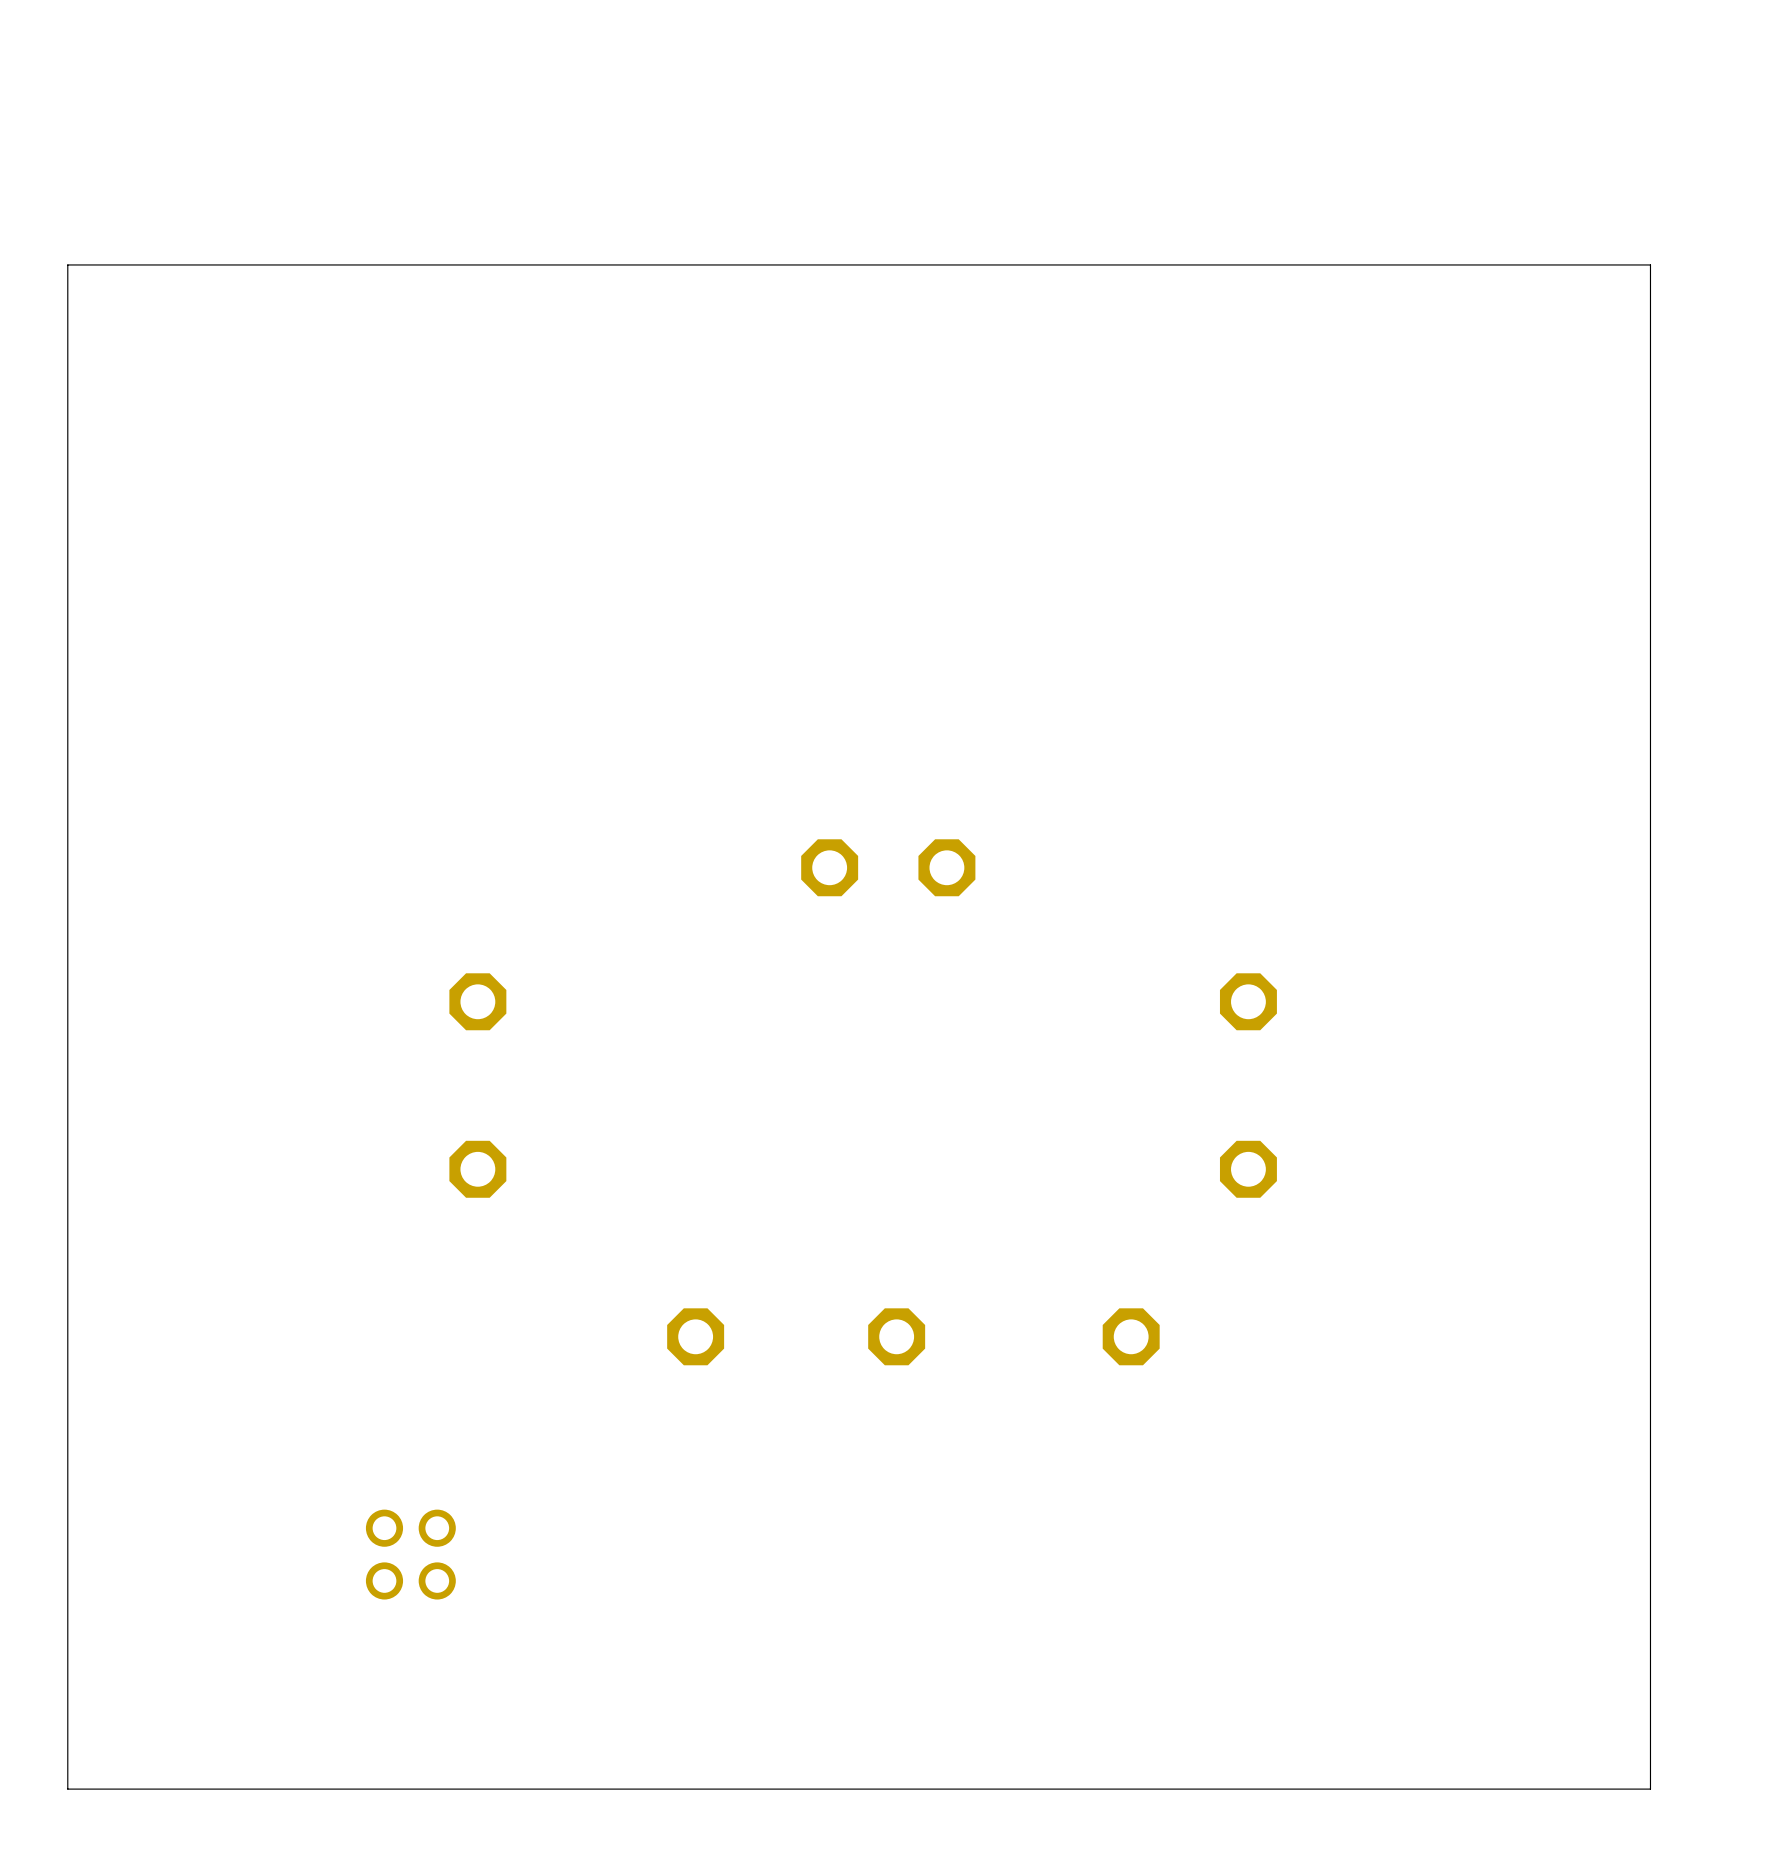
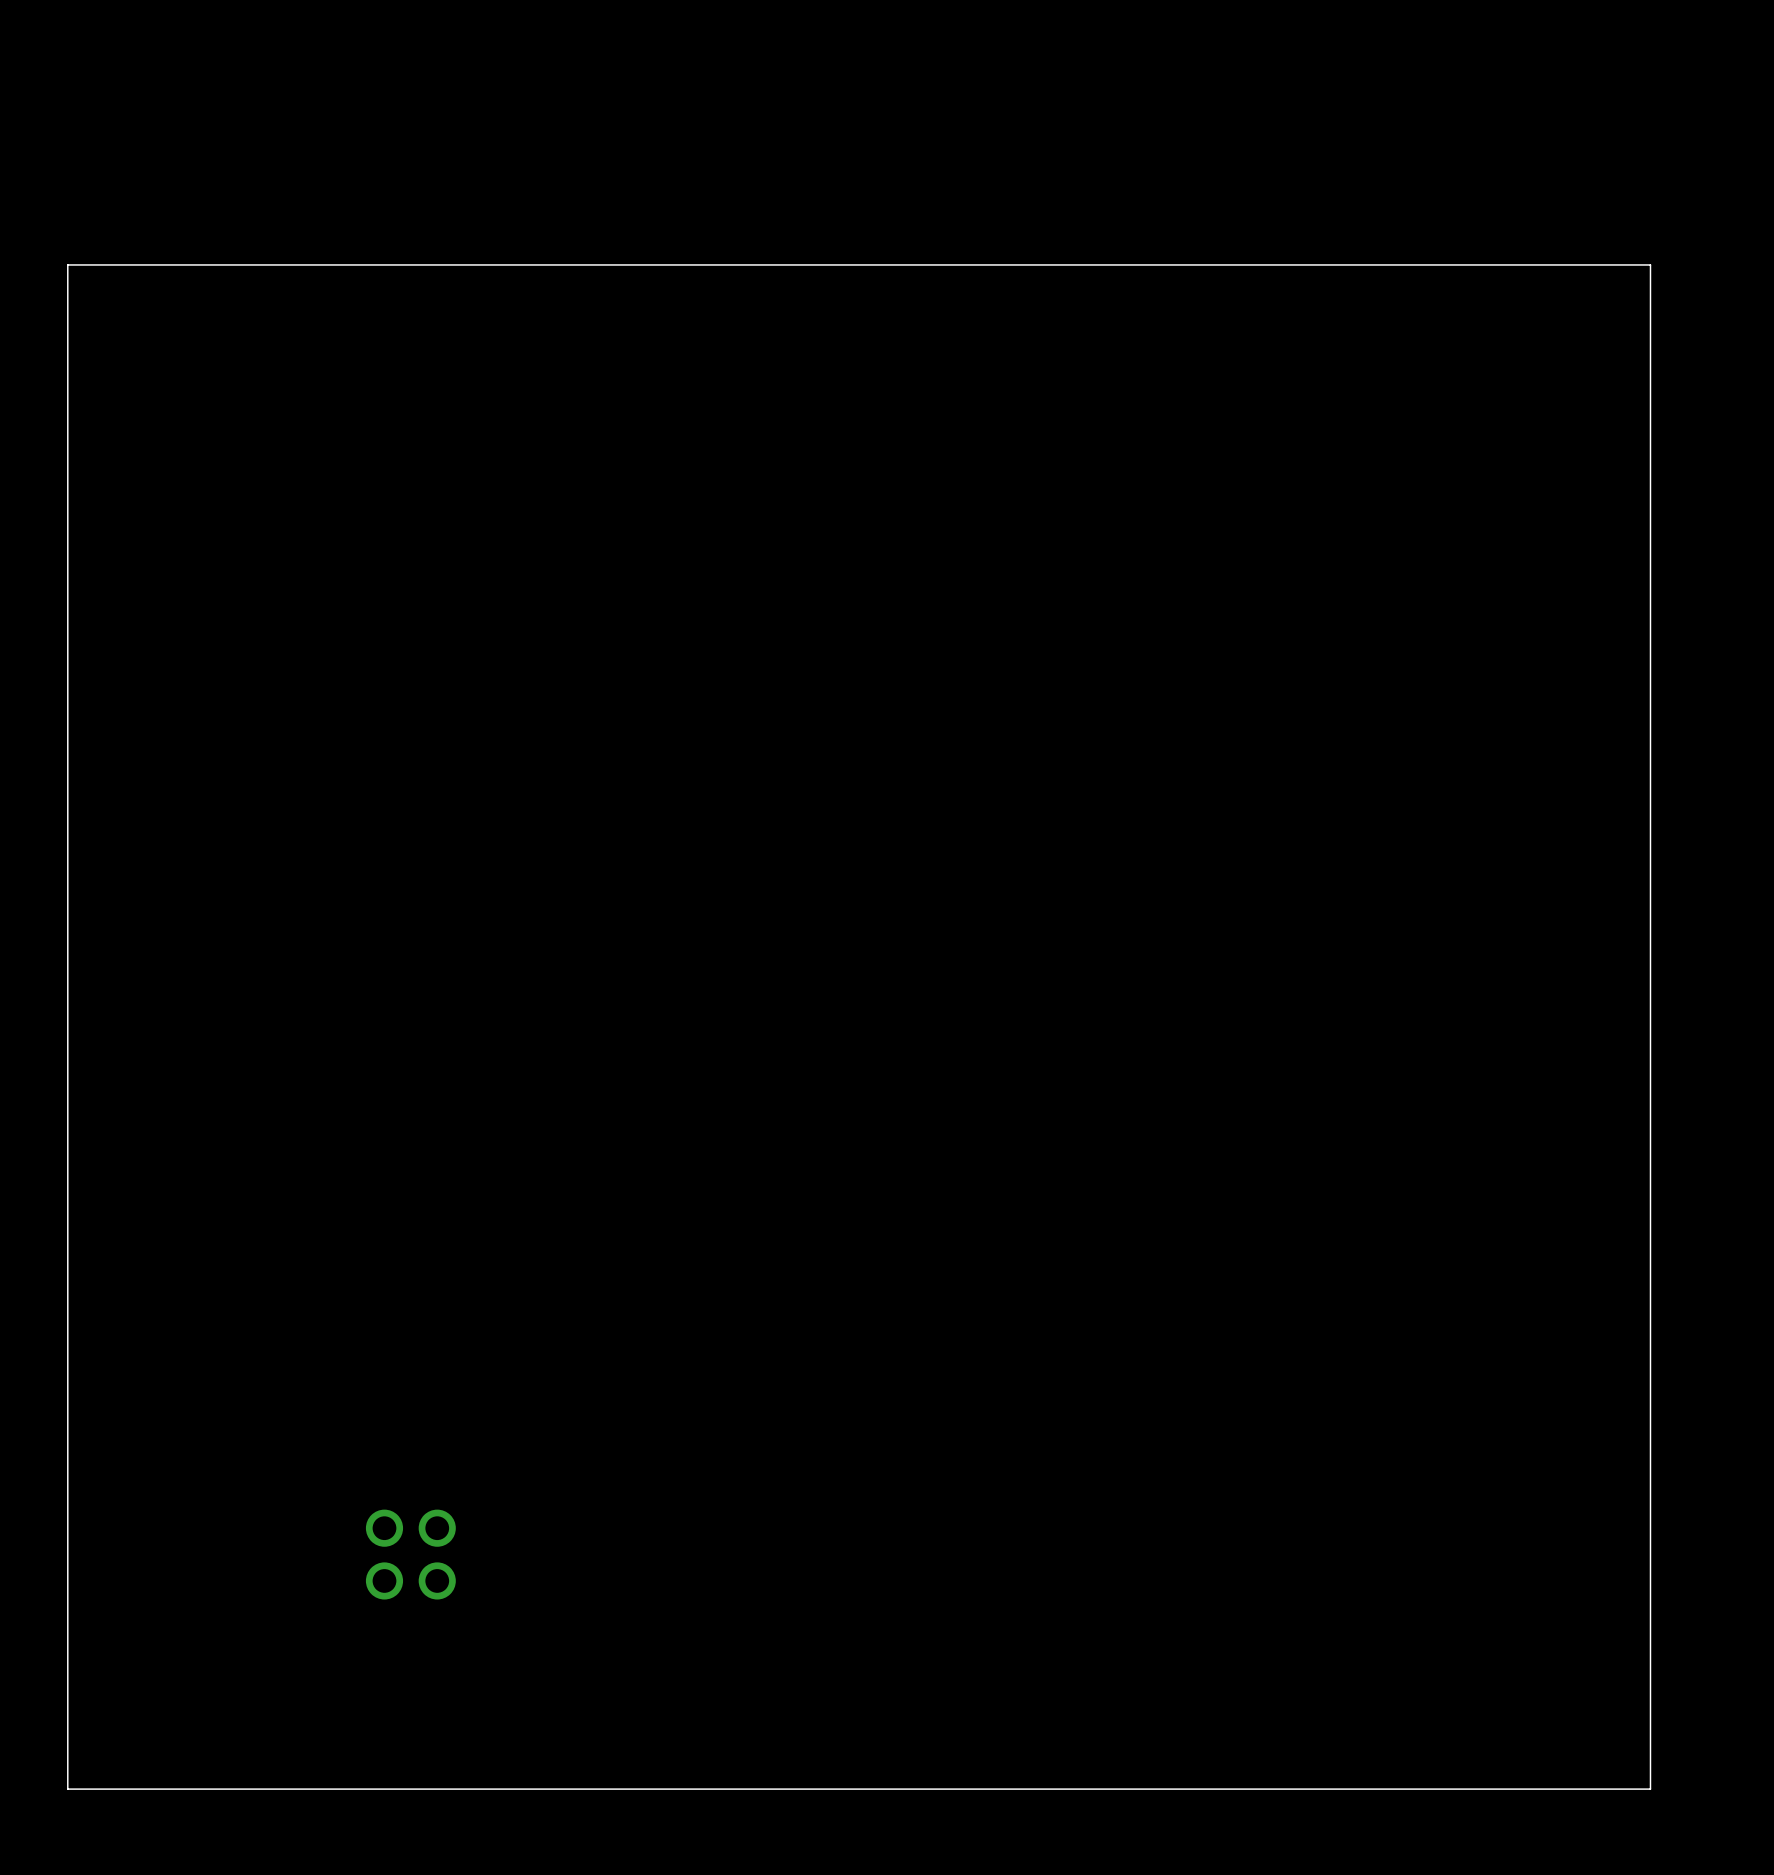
part: (829, 867) -> none
part: (946, 867) -> none
part: (477, 1001) -> none
part: (1248, 1001) -> none
part: (477, 1169) -> none
part: (1248, 1169) -> none
part: (695, 1336) -> none
part: (896, 1336) -> none
part: (1131, 1336) -> none

